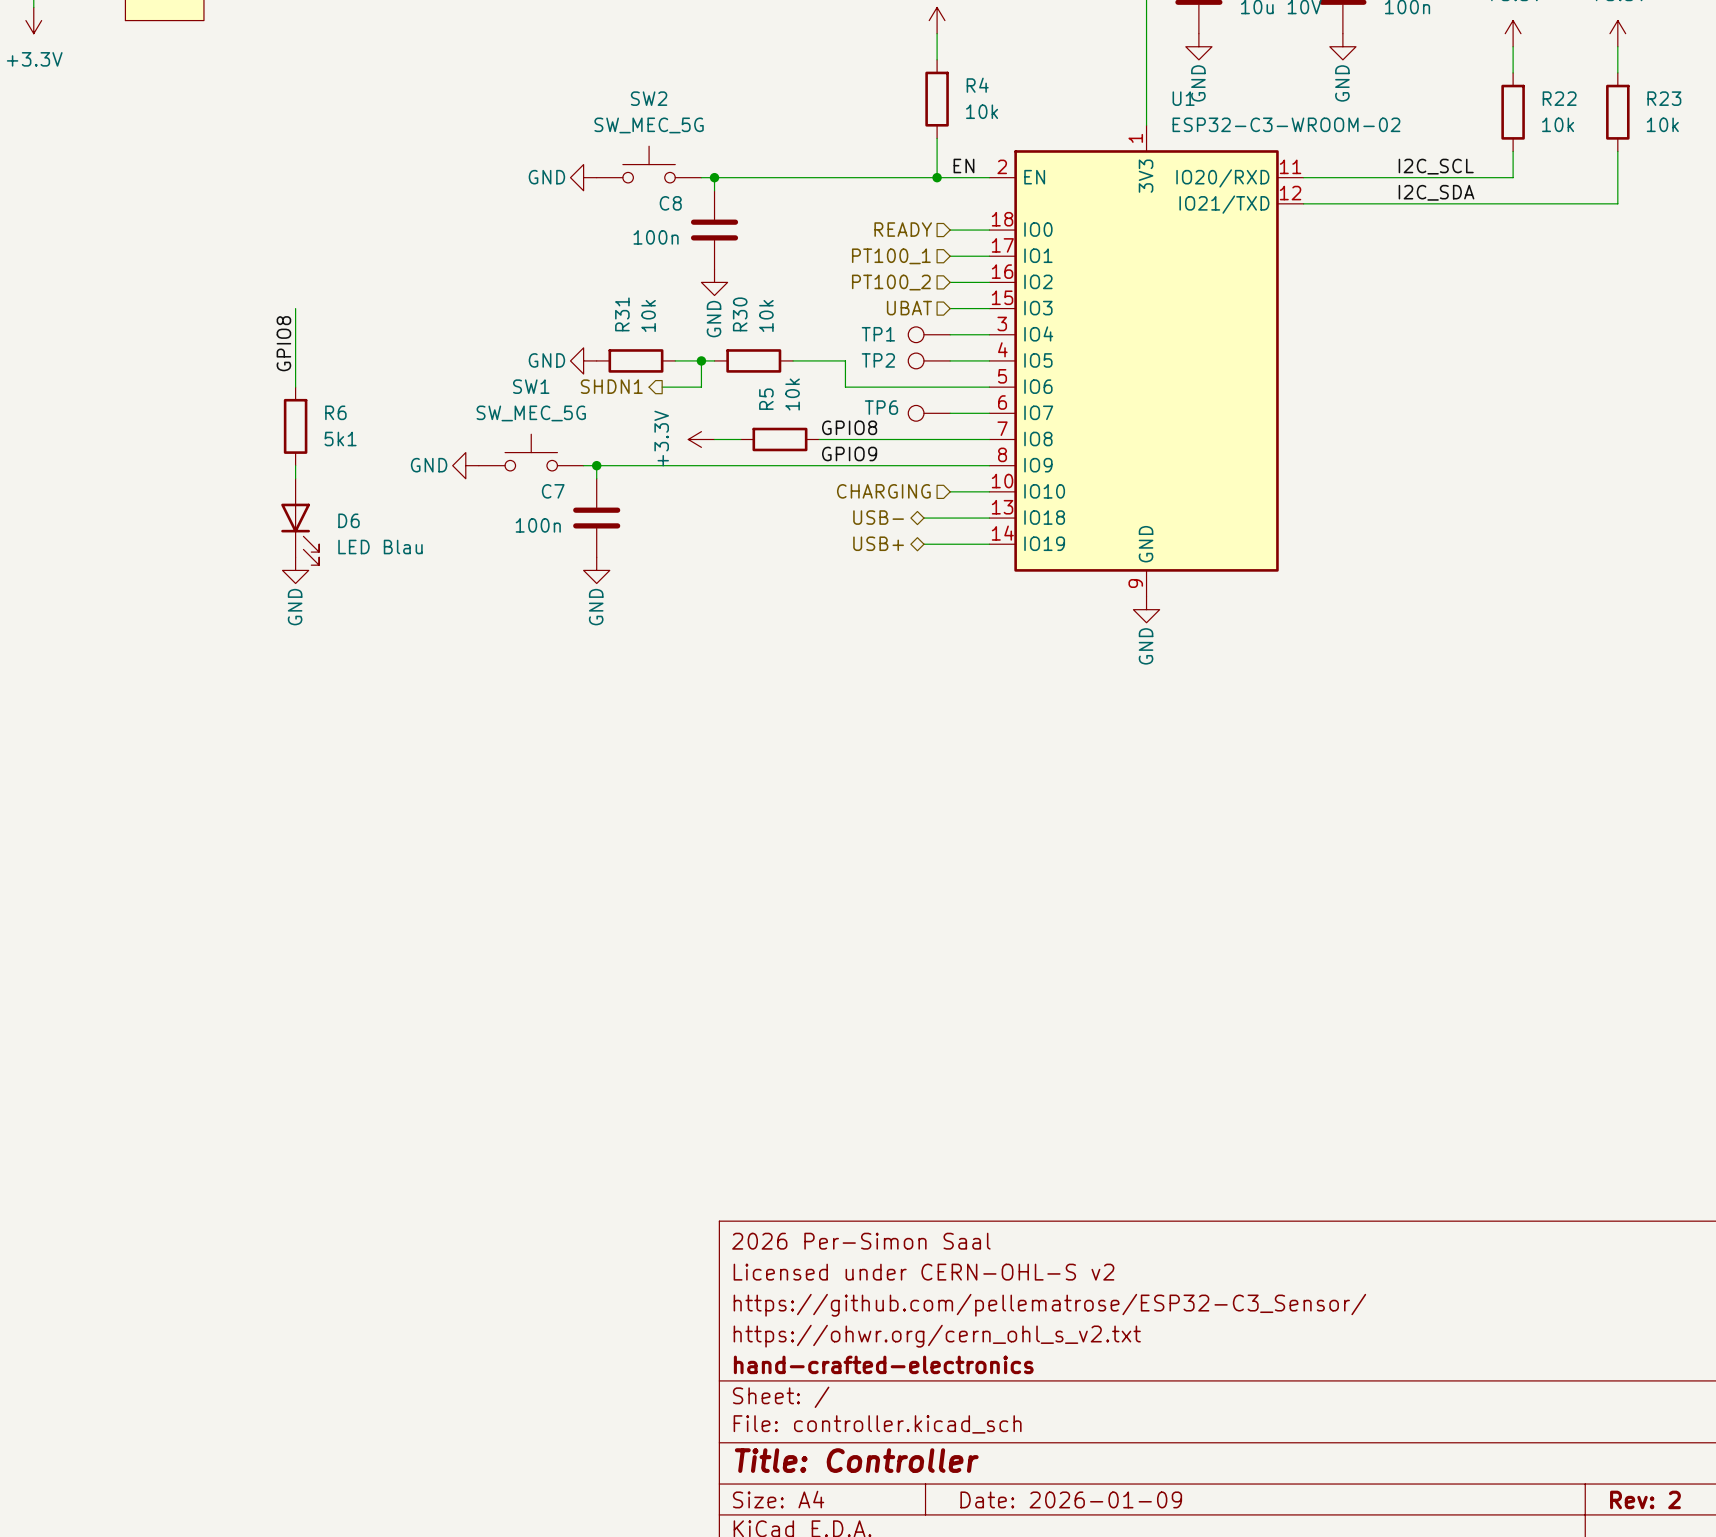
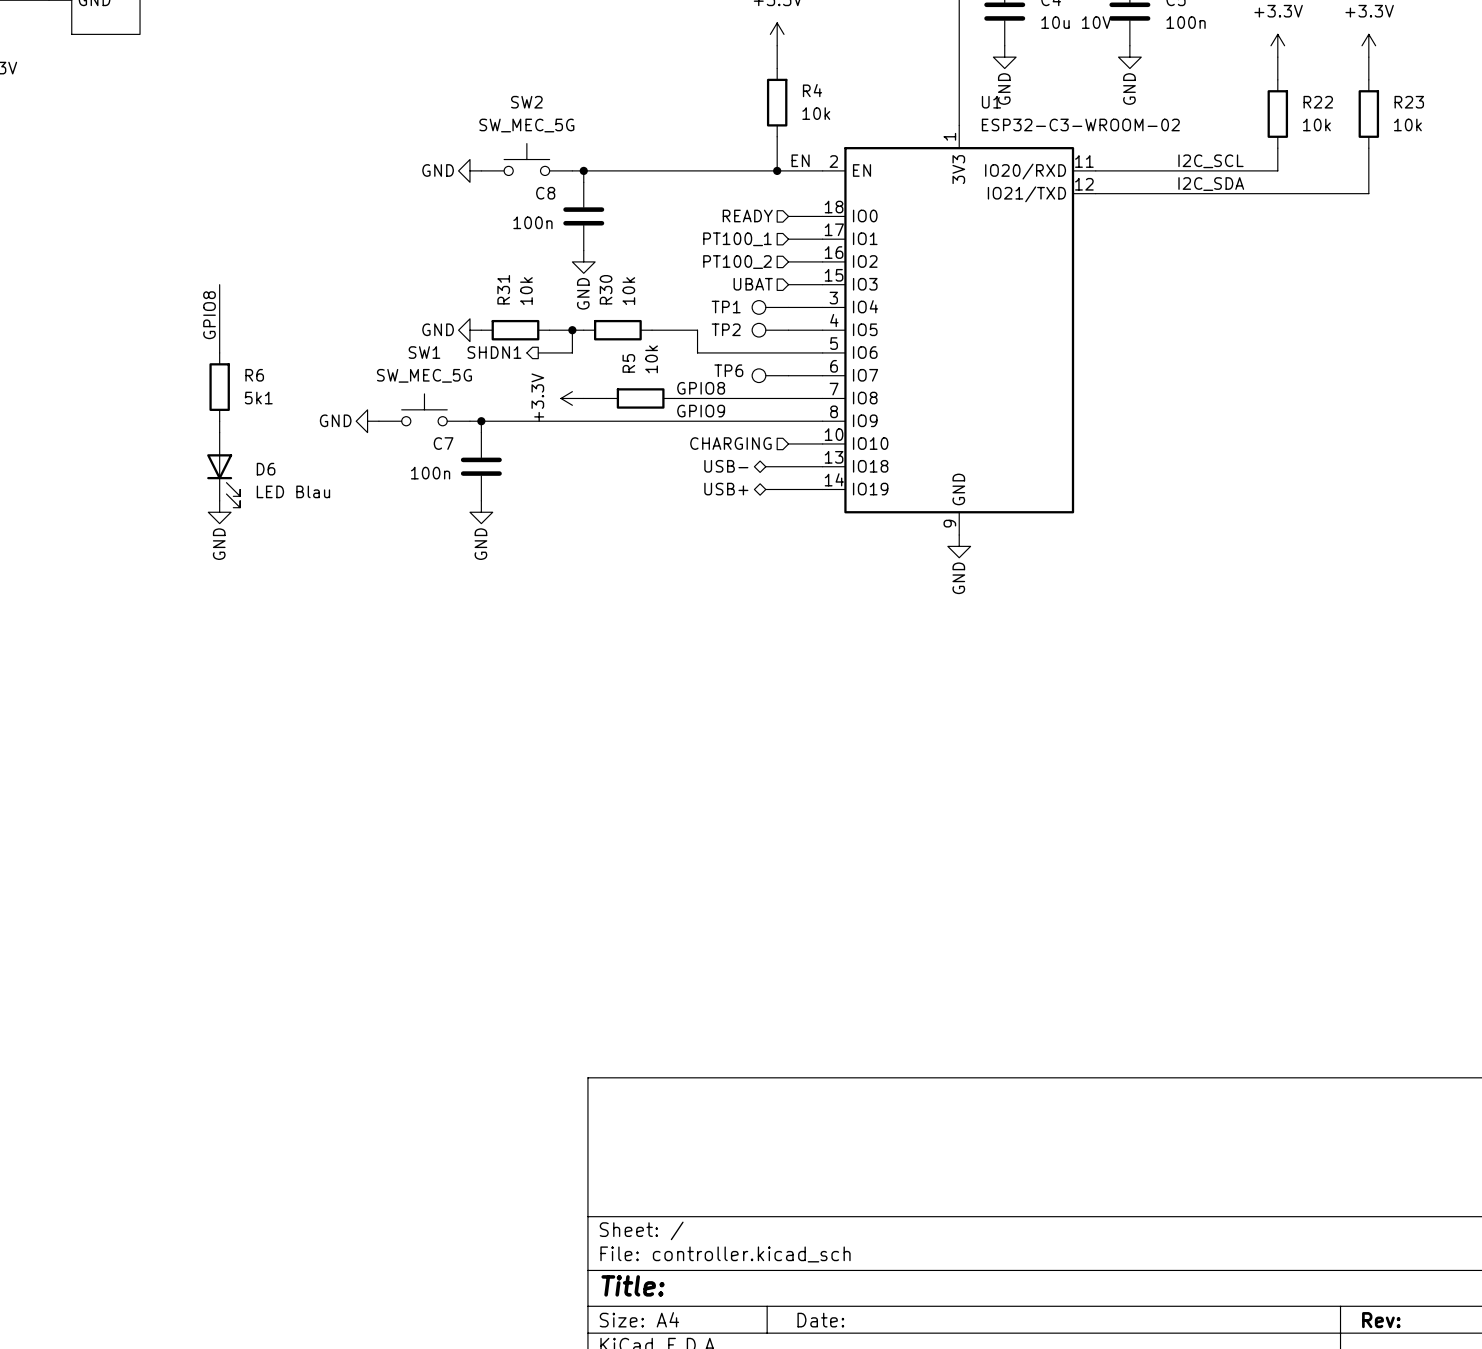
title block: 2026 Per-Simon Saal (861, 1241) -> none
title block: Licensed under CERN-OHL-S v2 (923, 1272) -> none
title block: https://github.com/pellematrose/ESP32-C3_Sensor/ (1049, 1305) -> none
title block: https://ohwr.org/cern_ohl_s_v2.txt (937, 1336) -> none
title block: hand-crafted-electronics (883, 1364) -> none
title block: Title: Controller (856, 1460) -> Title: (633, 1285)
title block: Date: 2026-01-09 (1071, 1499) -> Date: (820, 1320)
title block: Rev: 2 (1645, 1499) -> Rev: (1381, 1320)

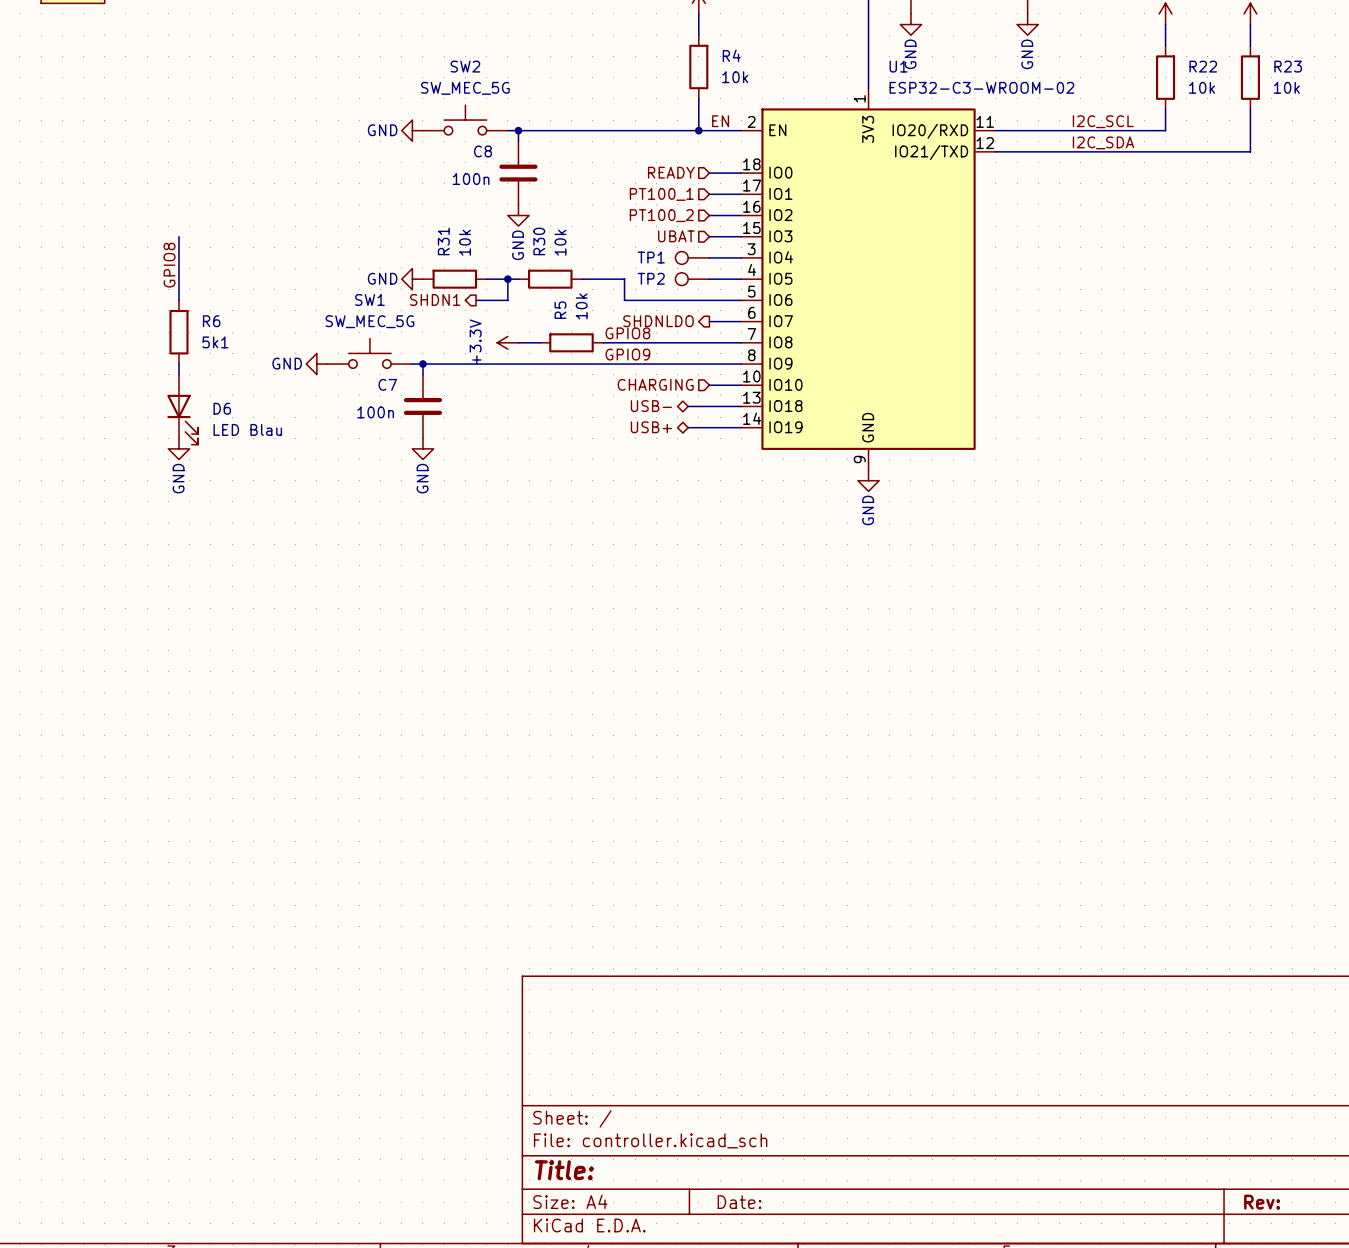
hierarchical label: none -> SHDNLDO (658, 321)
TP6: (770, 375) -> none

